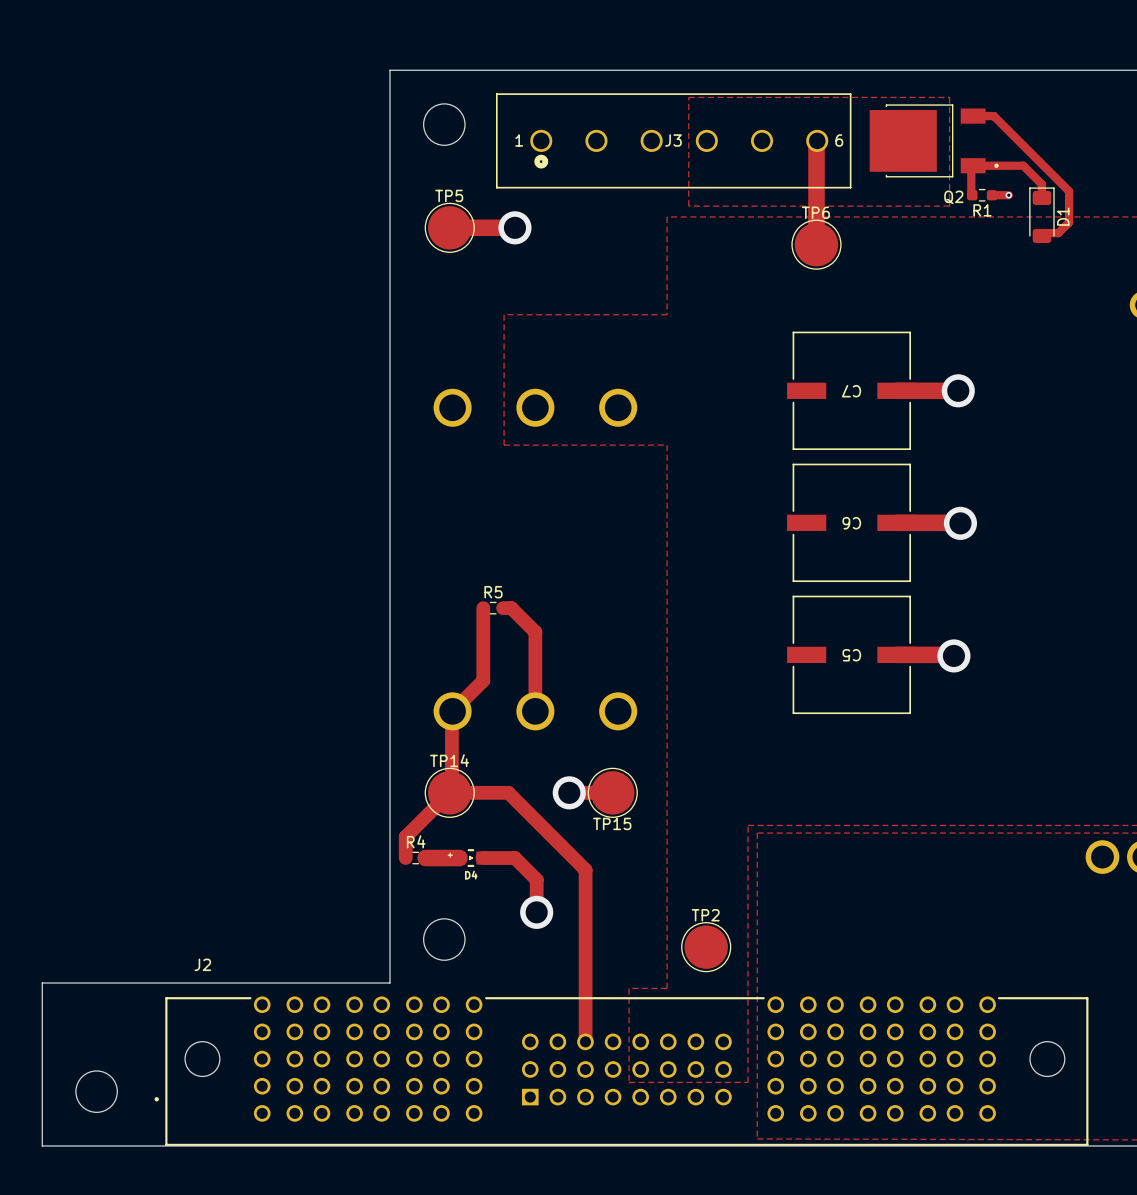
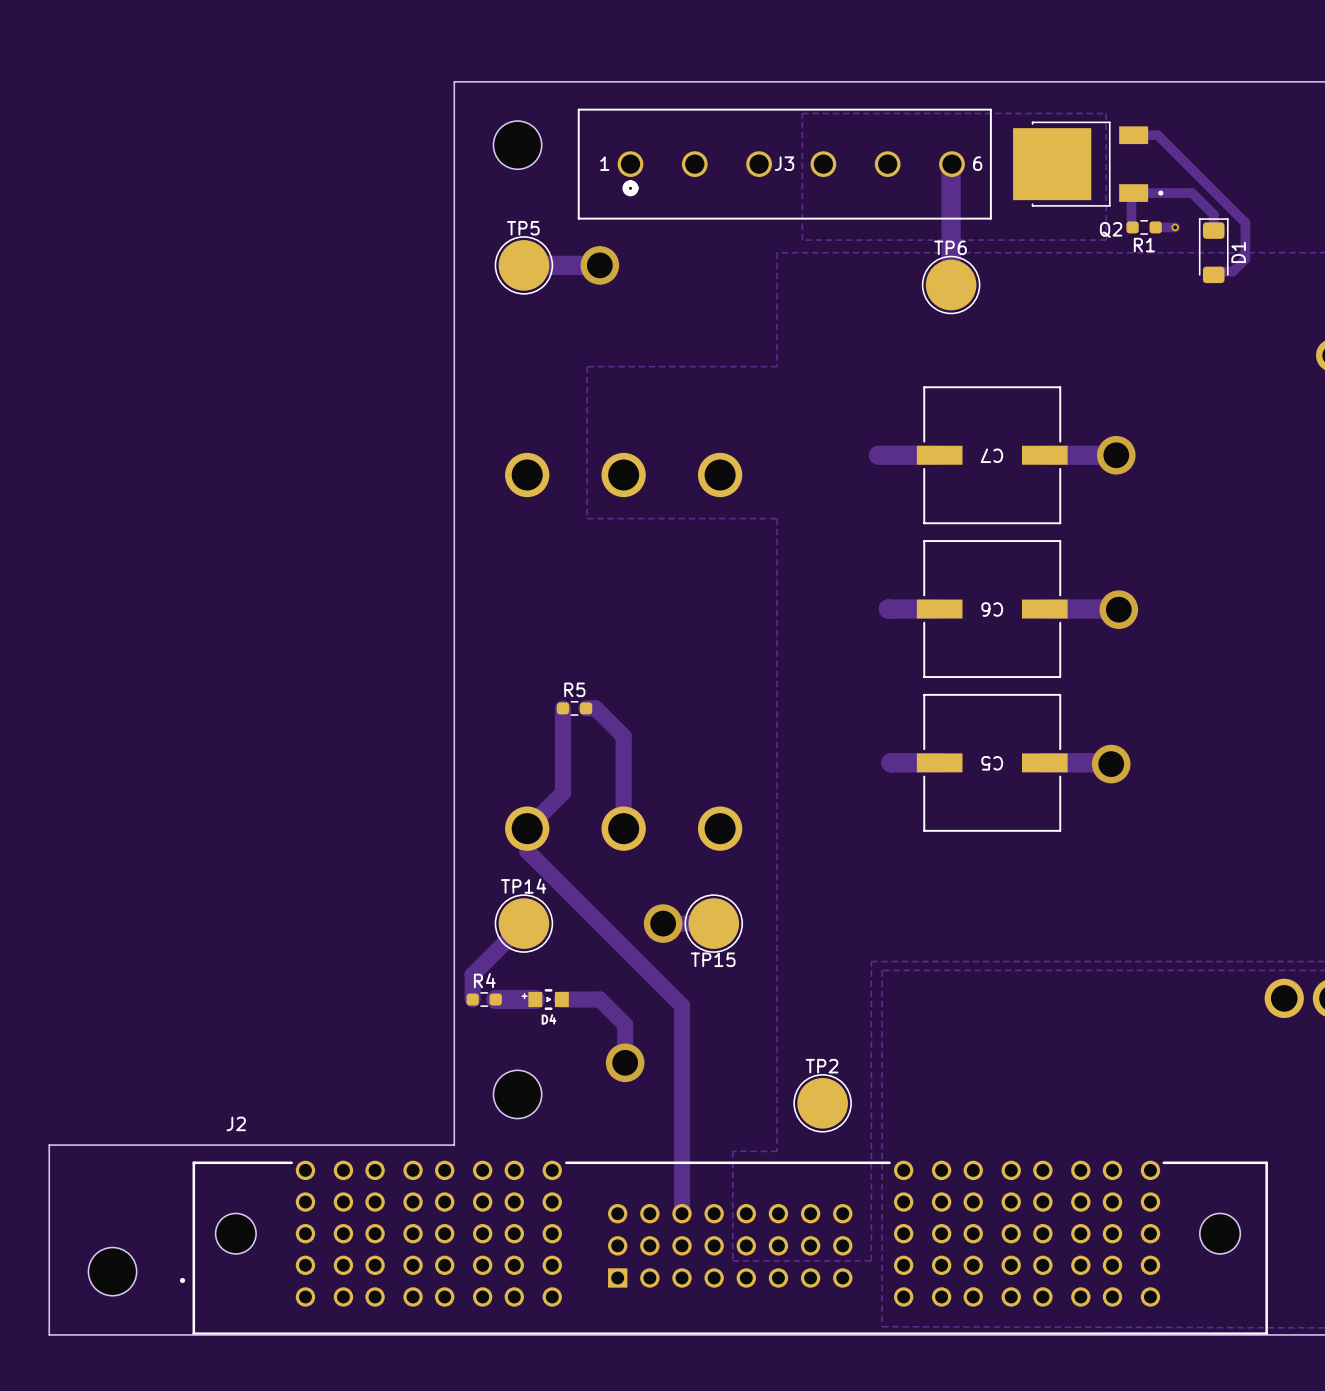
track: none -> (878, 455) (939, 455)
track: none -> (888, 609) (939, 609)
track: none -> (891, 762) (939, 762)
track: (451, 712) (451, 790) (449, 792) (508, 792) (585, 869) (585, 1041) -> (527, 828) (527, 850) (682, 1005) (682, 1213)

